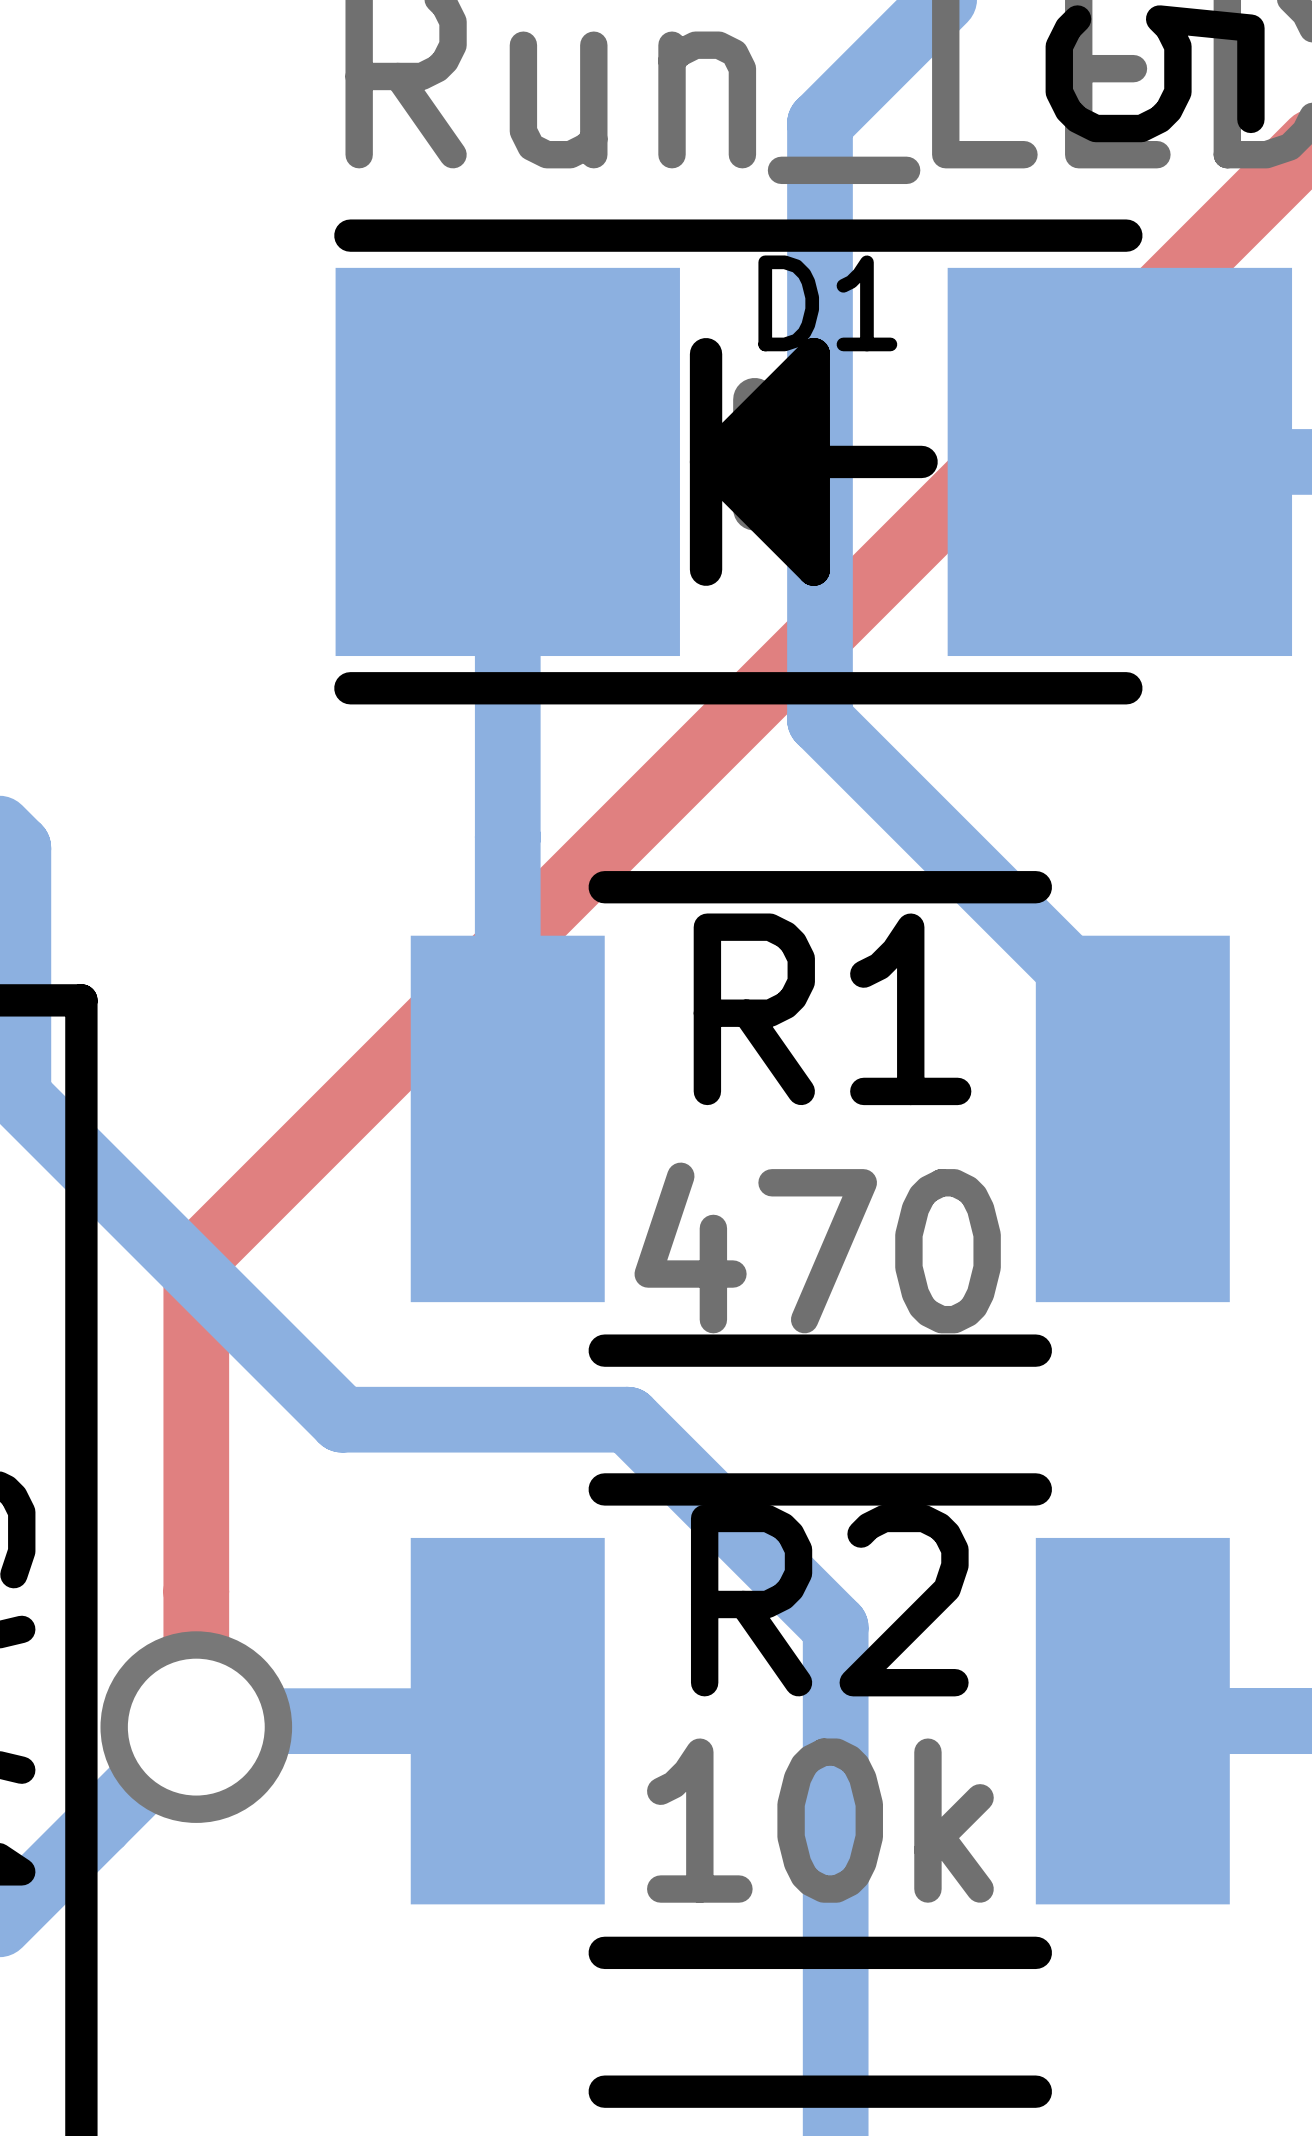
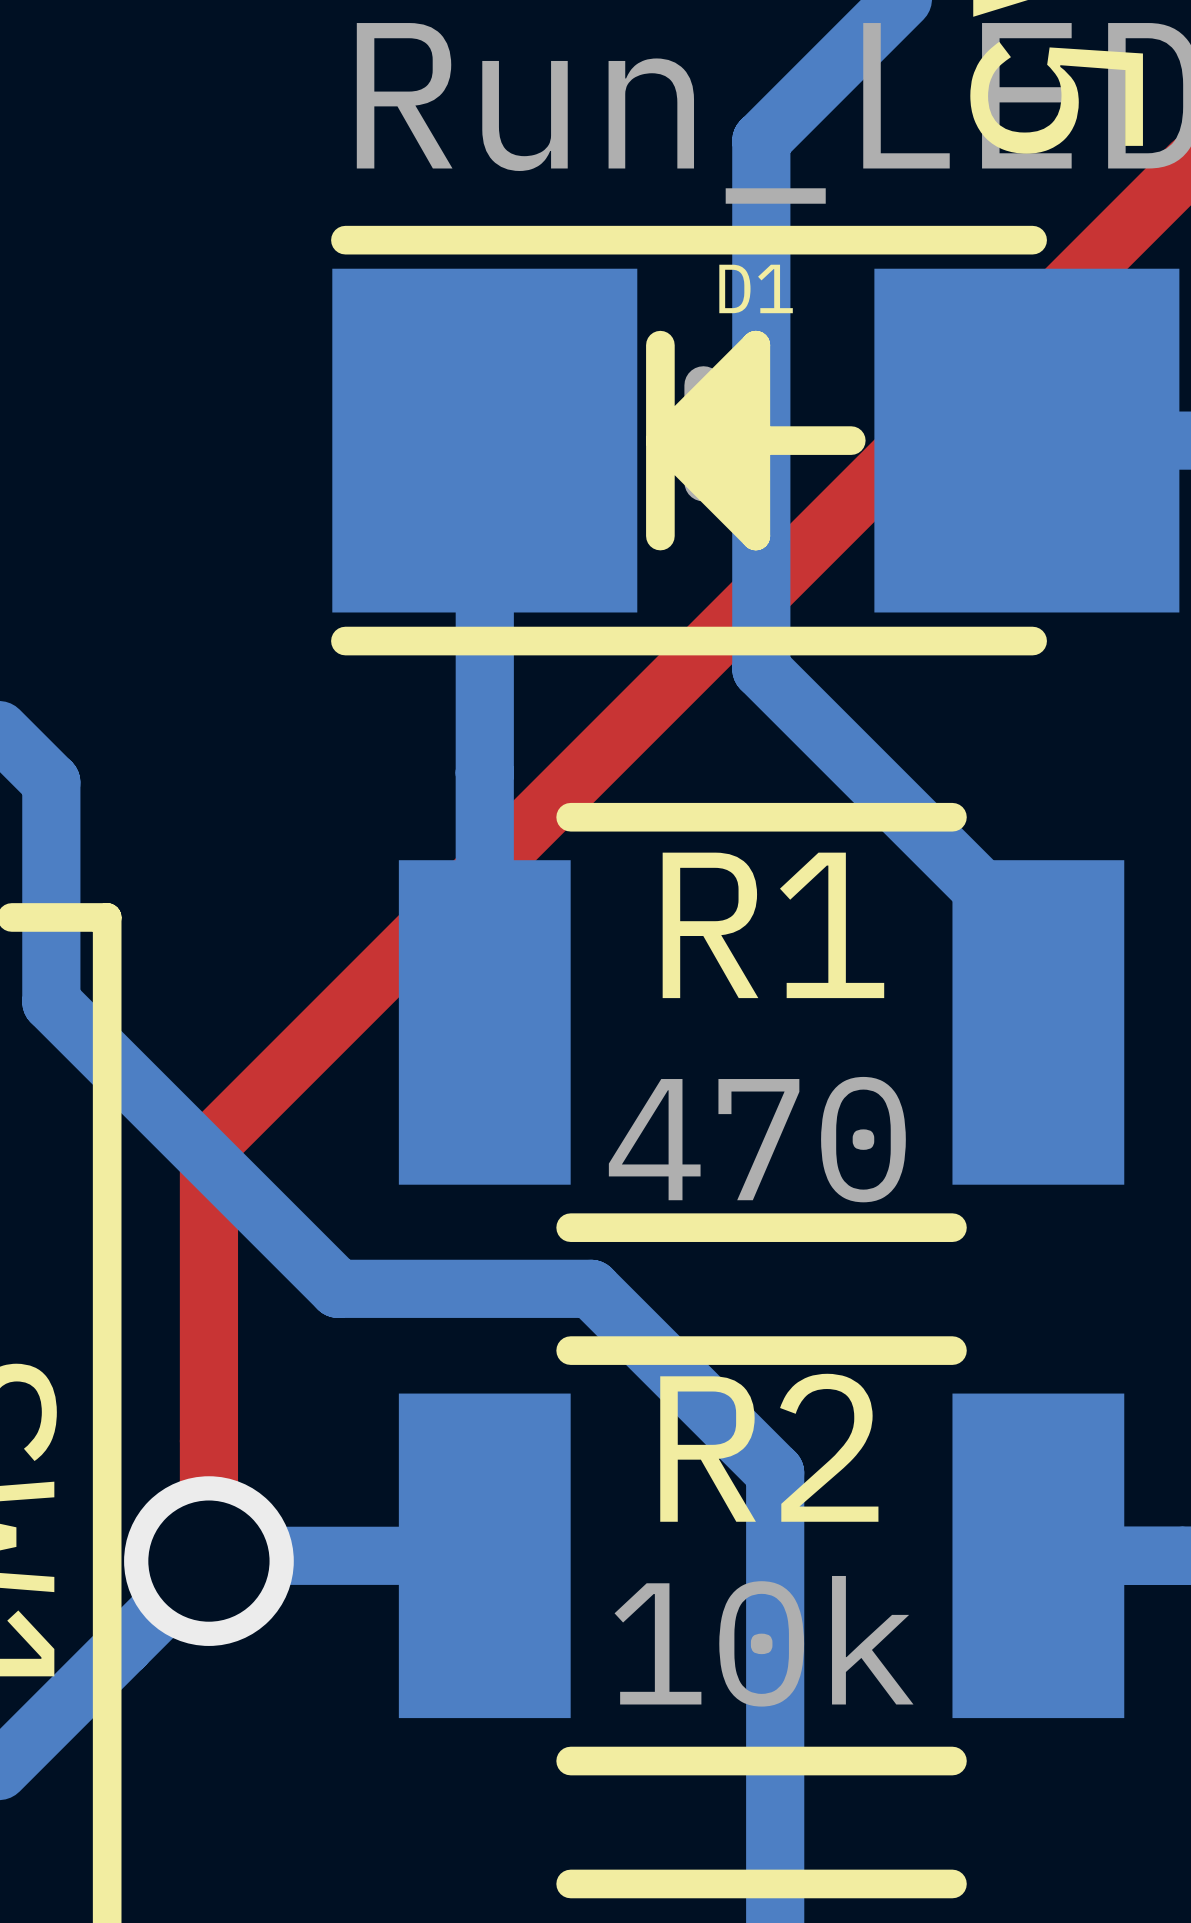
D1 name position: D1 (827, 303) -> D1 (756, 288)

